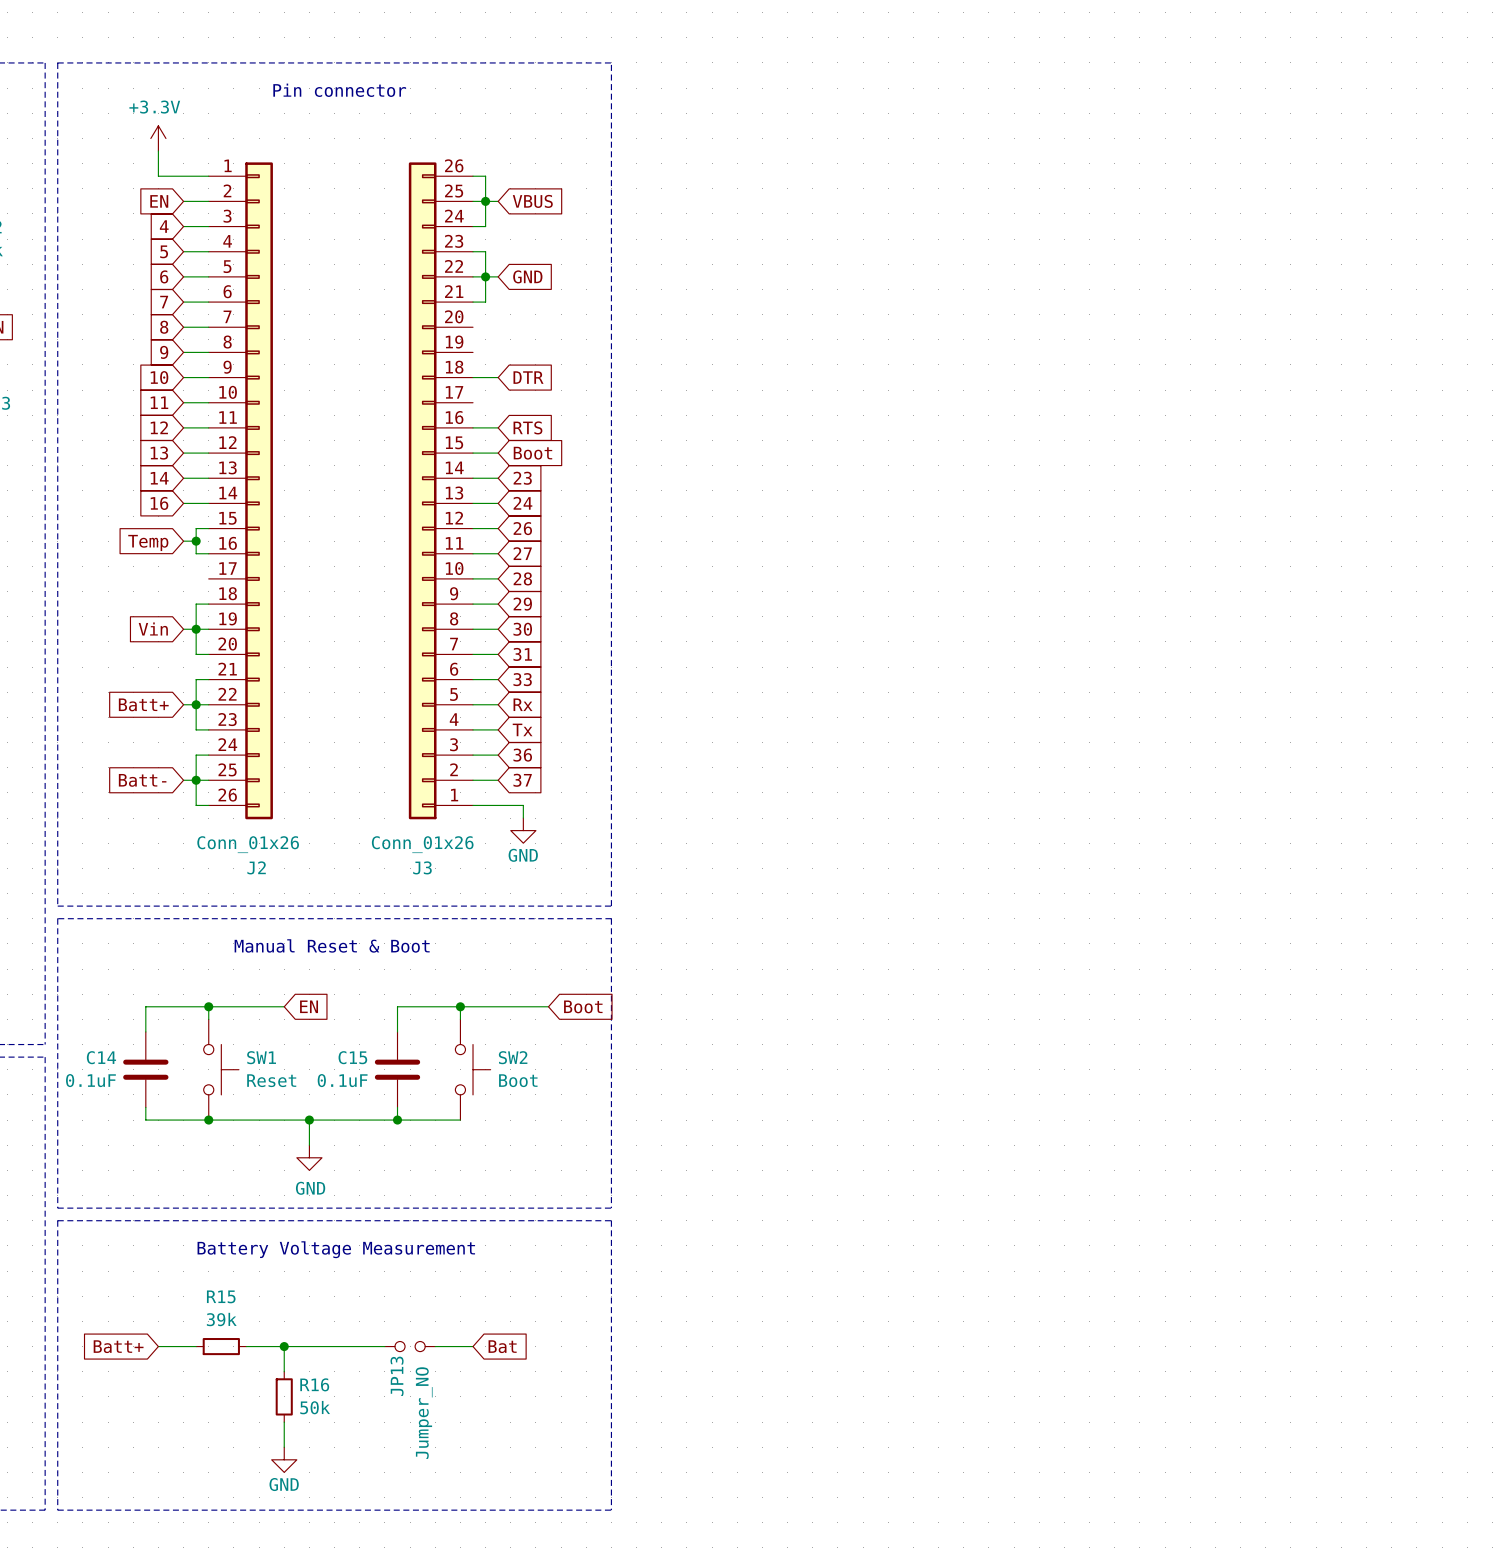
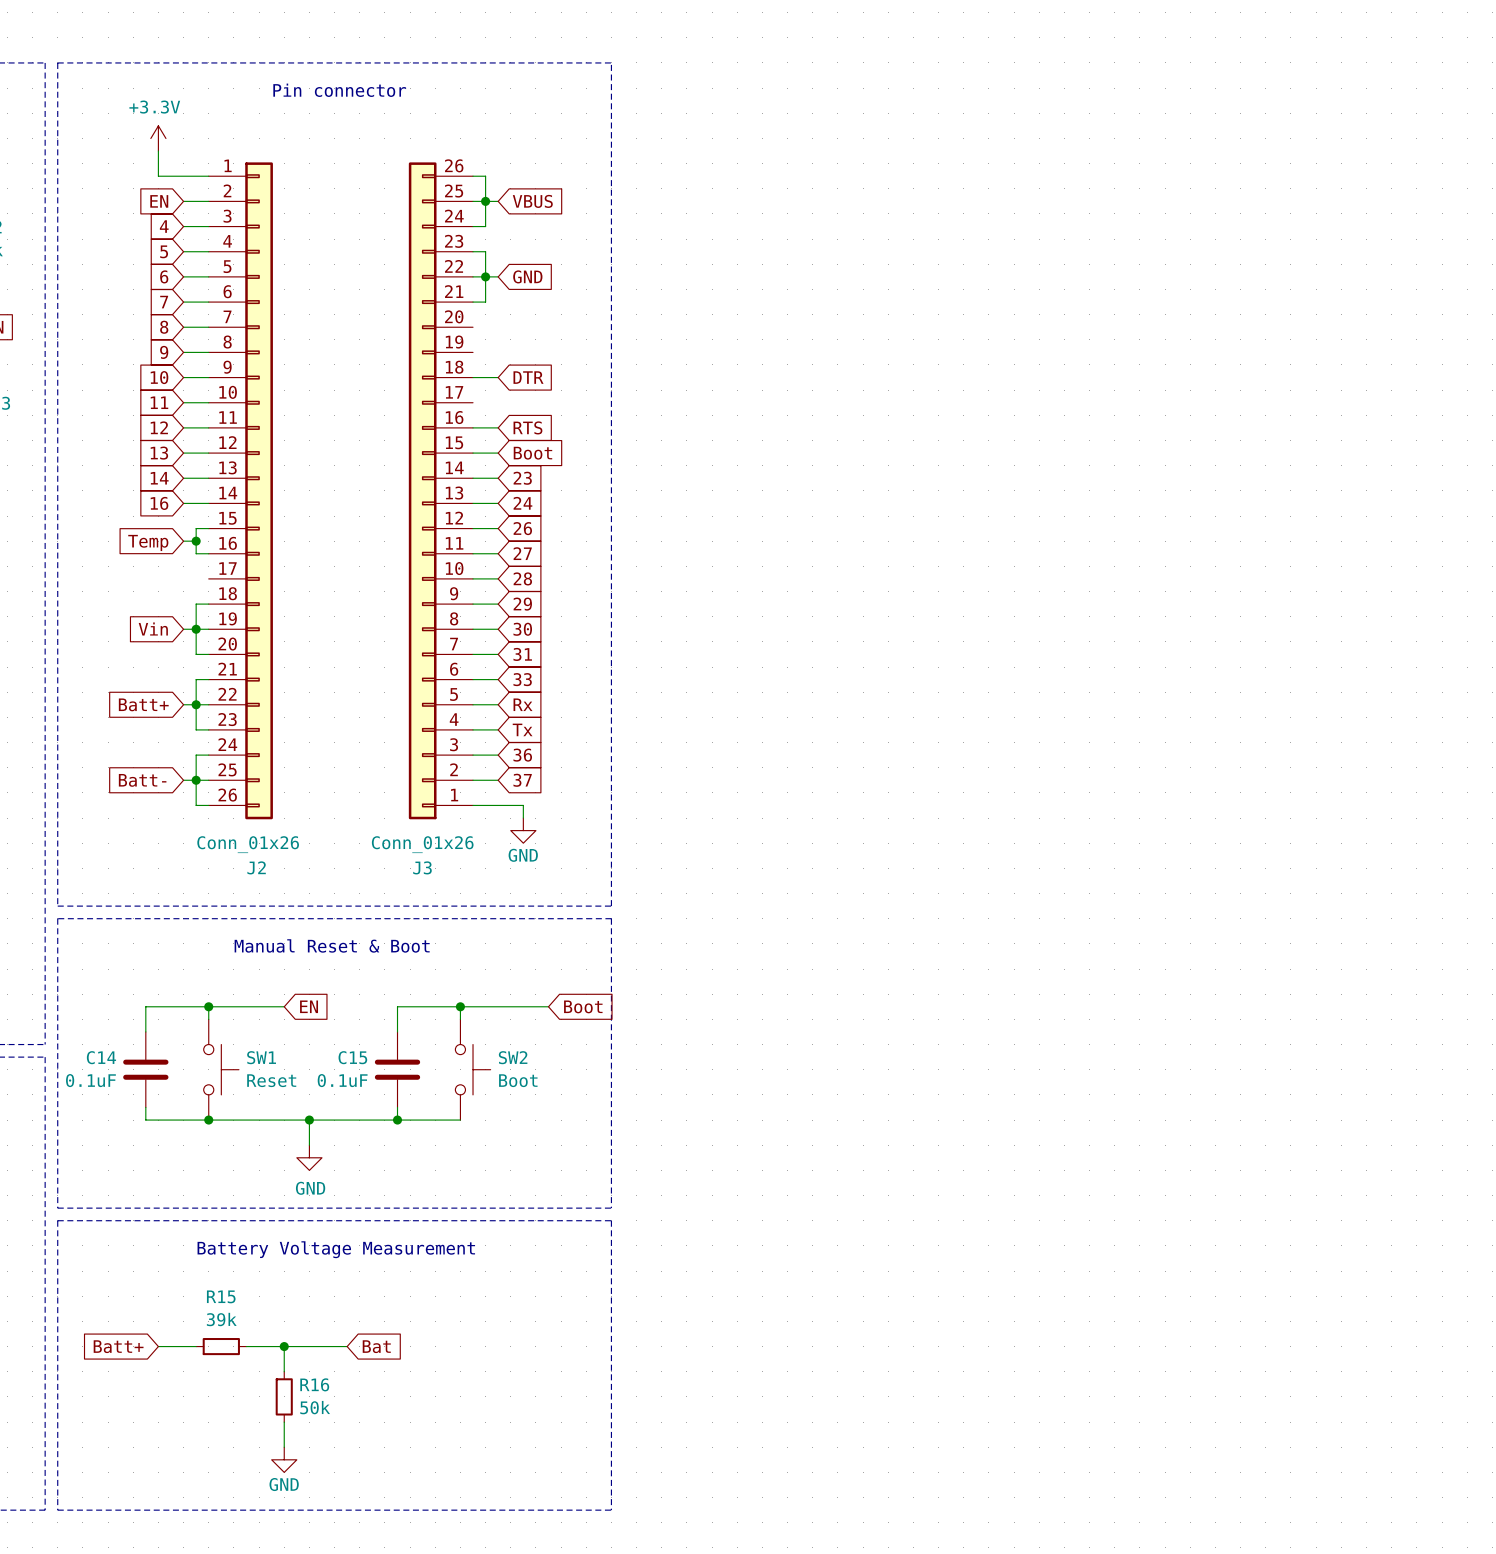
wire: (347, 1346) (384, 1346) -> none
JP13: Jumper_NO (410, 1346) -> none
wire: (435, 1346) (473, 1346) -> none
global label position: Bat (502, 1346) -> Bat (376, 1346)

